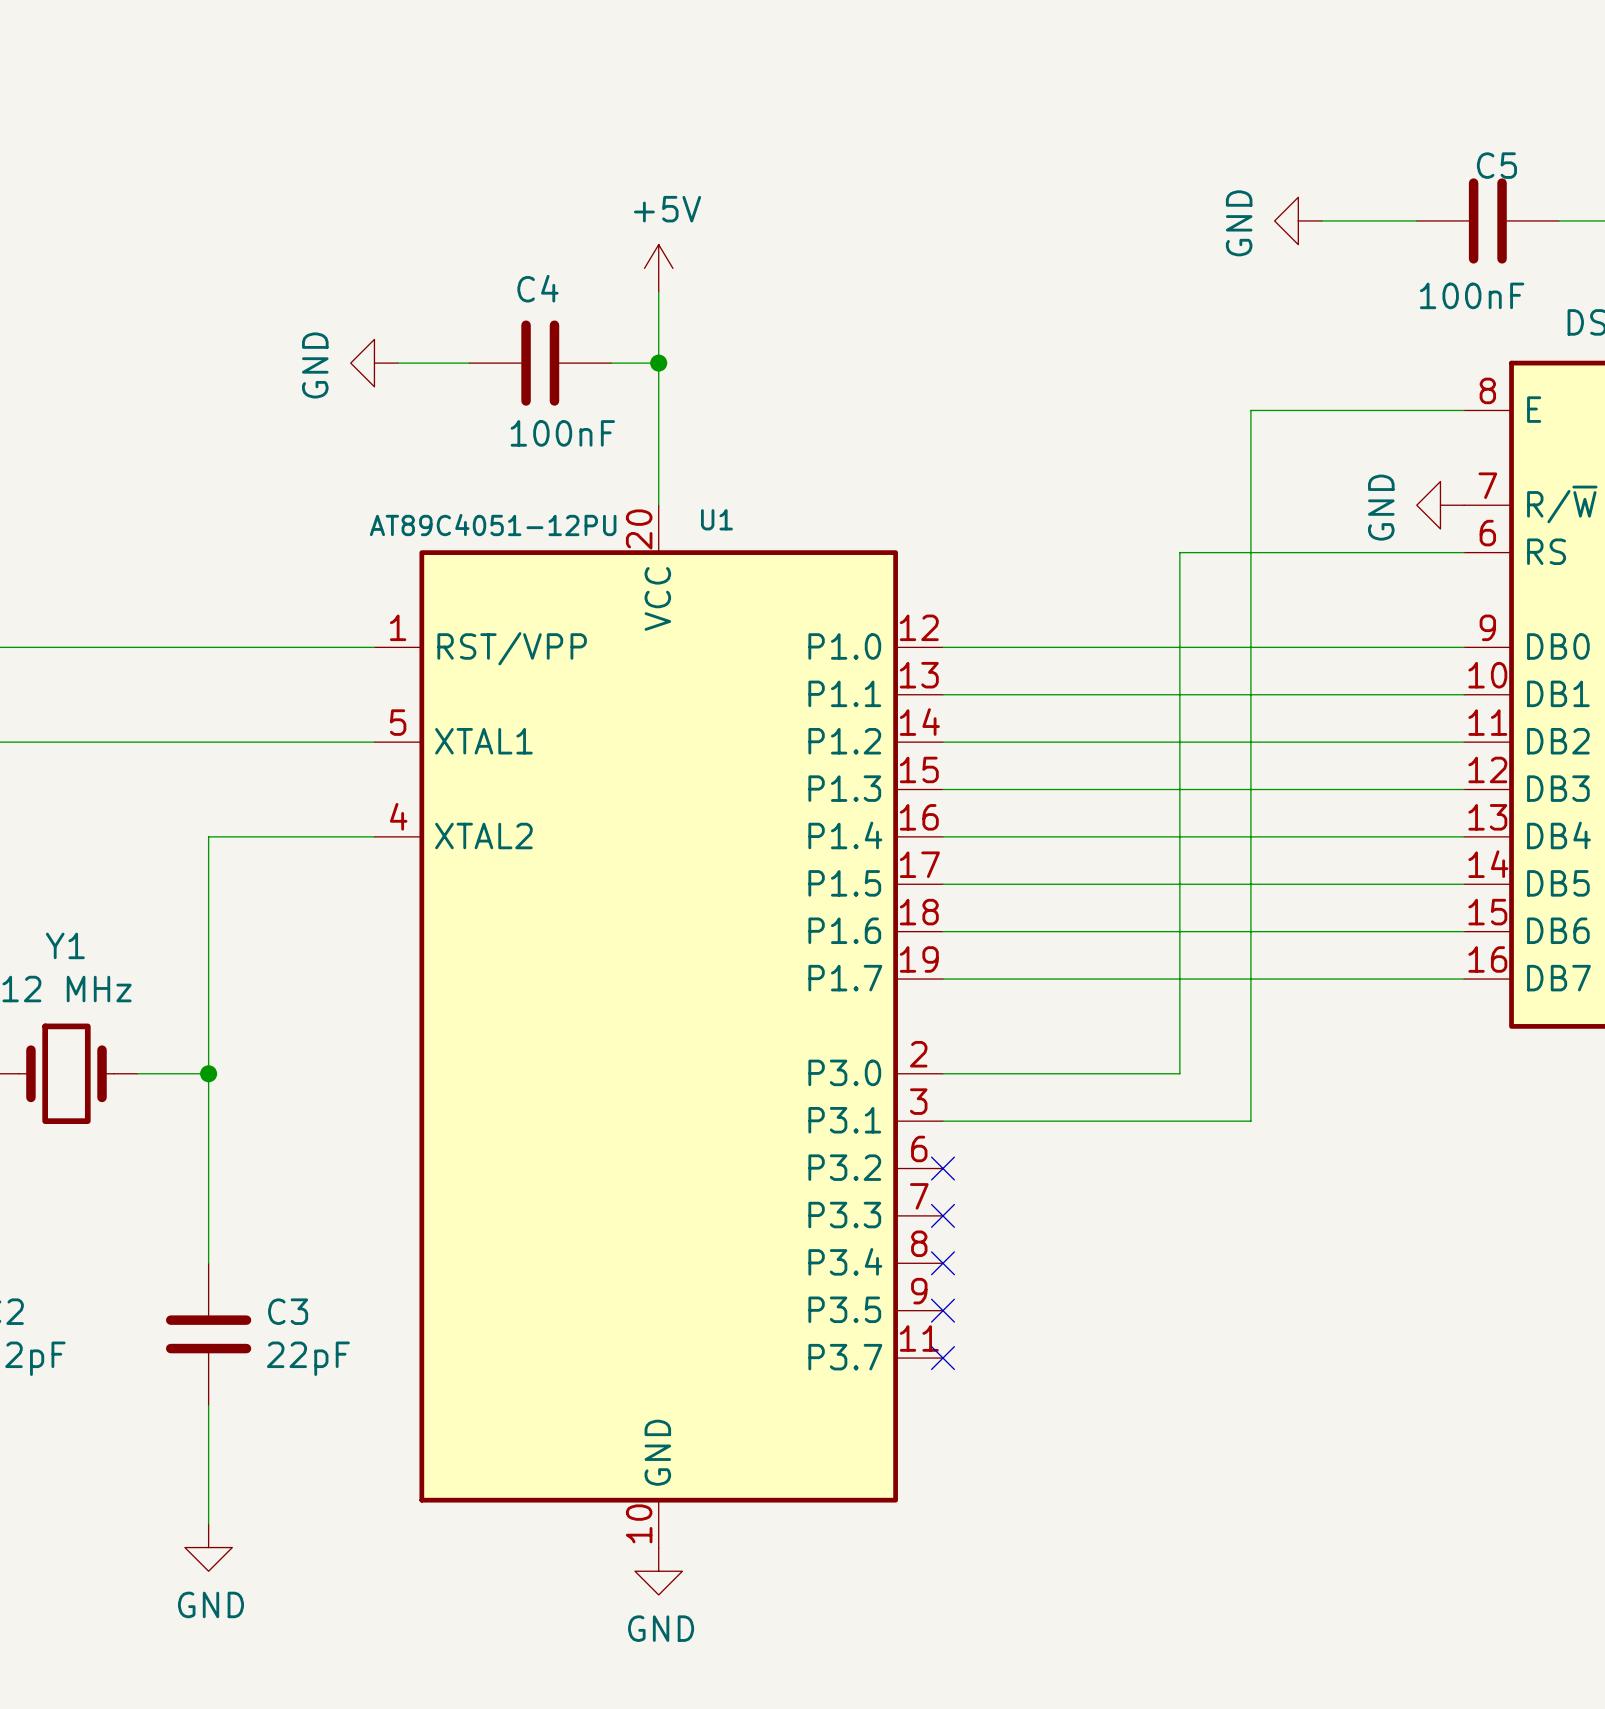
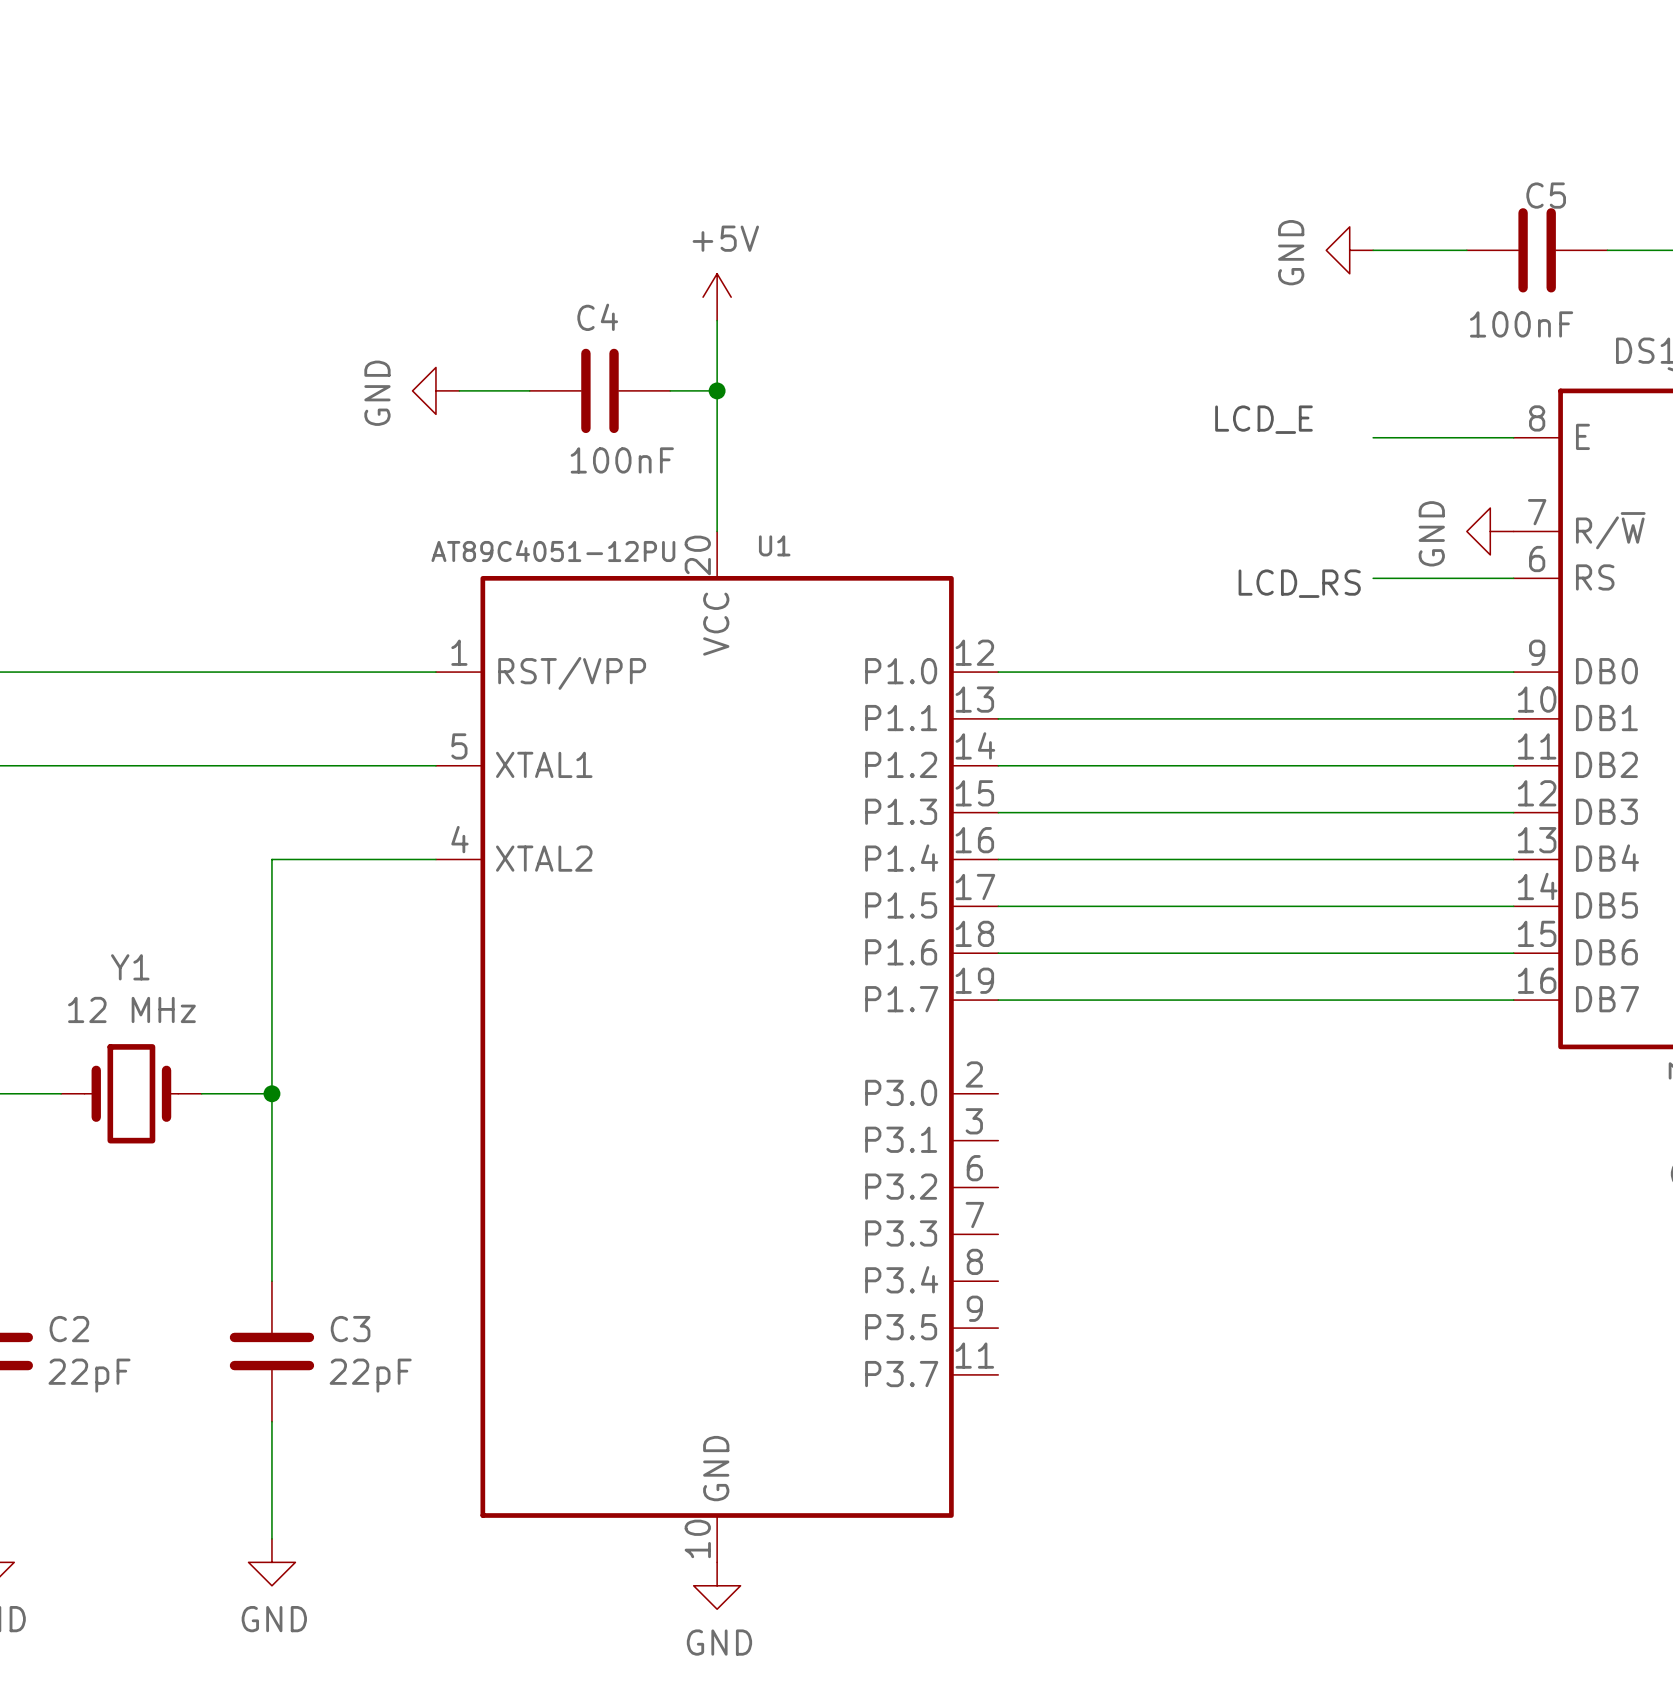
text: none -> LCD_E (1263, 419)
wire: (1322, 410) (1250, 410) (1250, 1121) (942, 1121) -> none
wire: (1322, 552) (1179, 552) (1179, 1073) (942, 1073) -> none
text: none -> LCD_RS (1299, 583)
no-connect mark: (942, 1168) -> none
no-connect mark: (942, 1215) -> none
no-connect mark: (942, 1263) -> none
no-connect mark: (942, 1310) -> none
no-connect mark: (942, 1358) -> none

